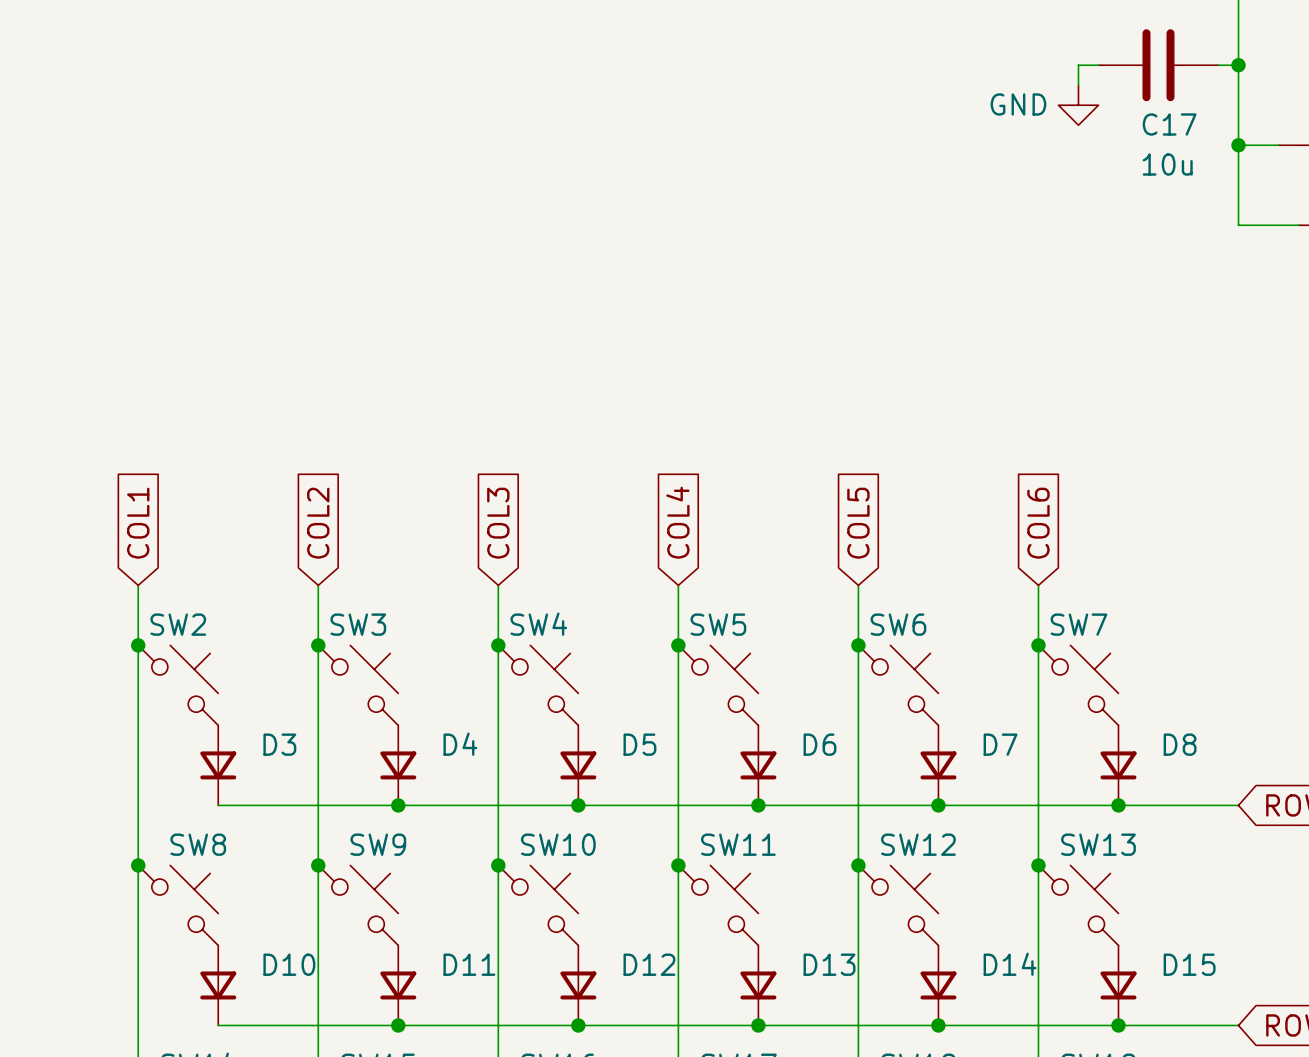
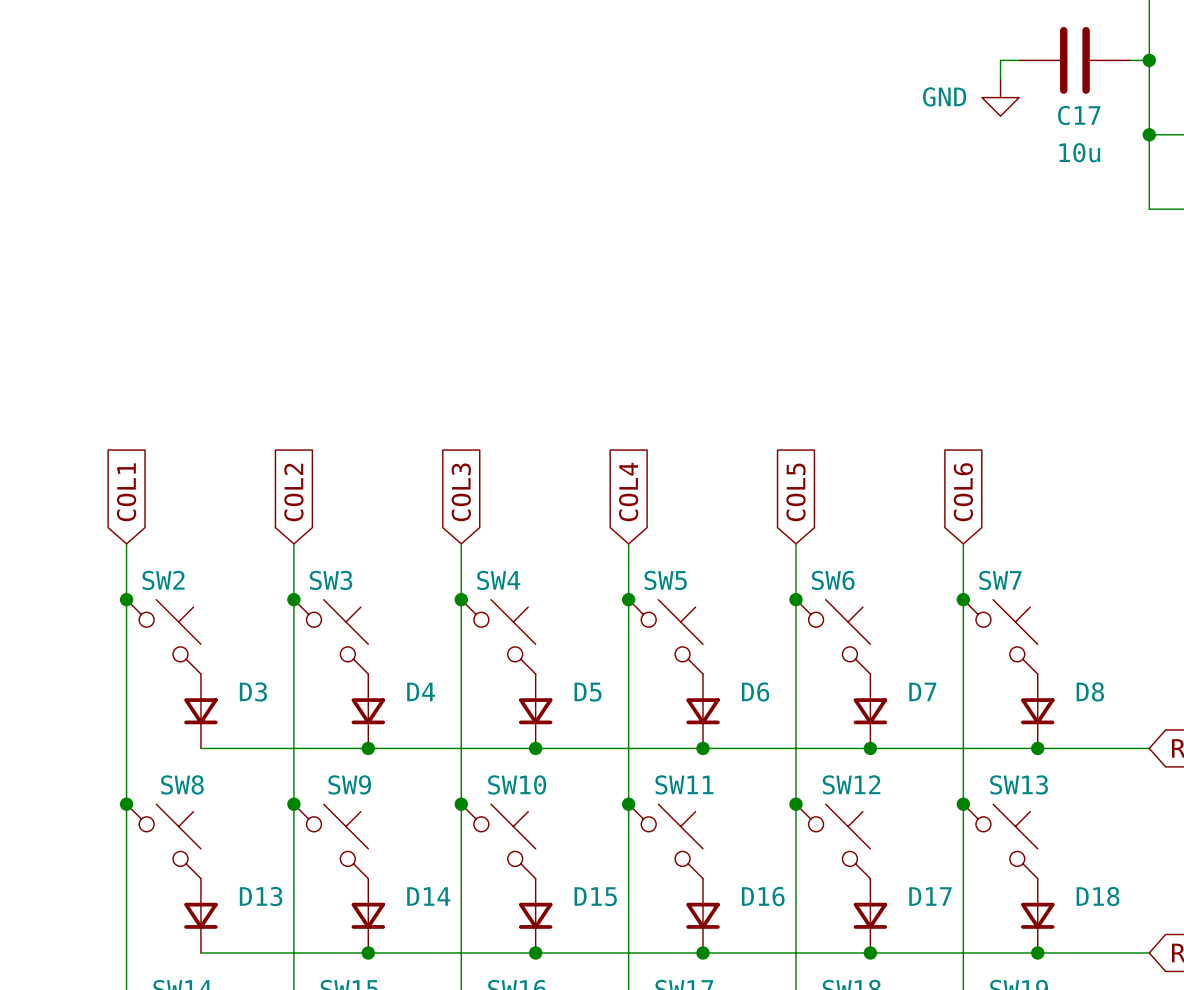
D10 name: D10 (289, 964) -> D13 (261, 896)
D11 name: D11 (469, 964) -> D14 (428, 896)
D12 name: D12 (649, 964) -> D15 (595, 896)
D13 name: D13 (829, 964) -> D16 (763, 896)
D14 name: D14 (1010, 964) -> D17 (930, 896)
D15 name: D15 (1189, 964) -> D18 (1097, 896)

